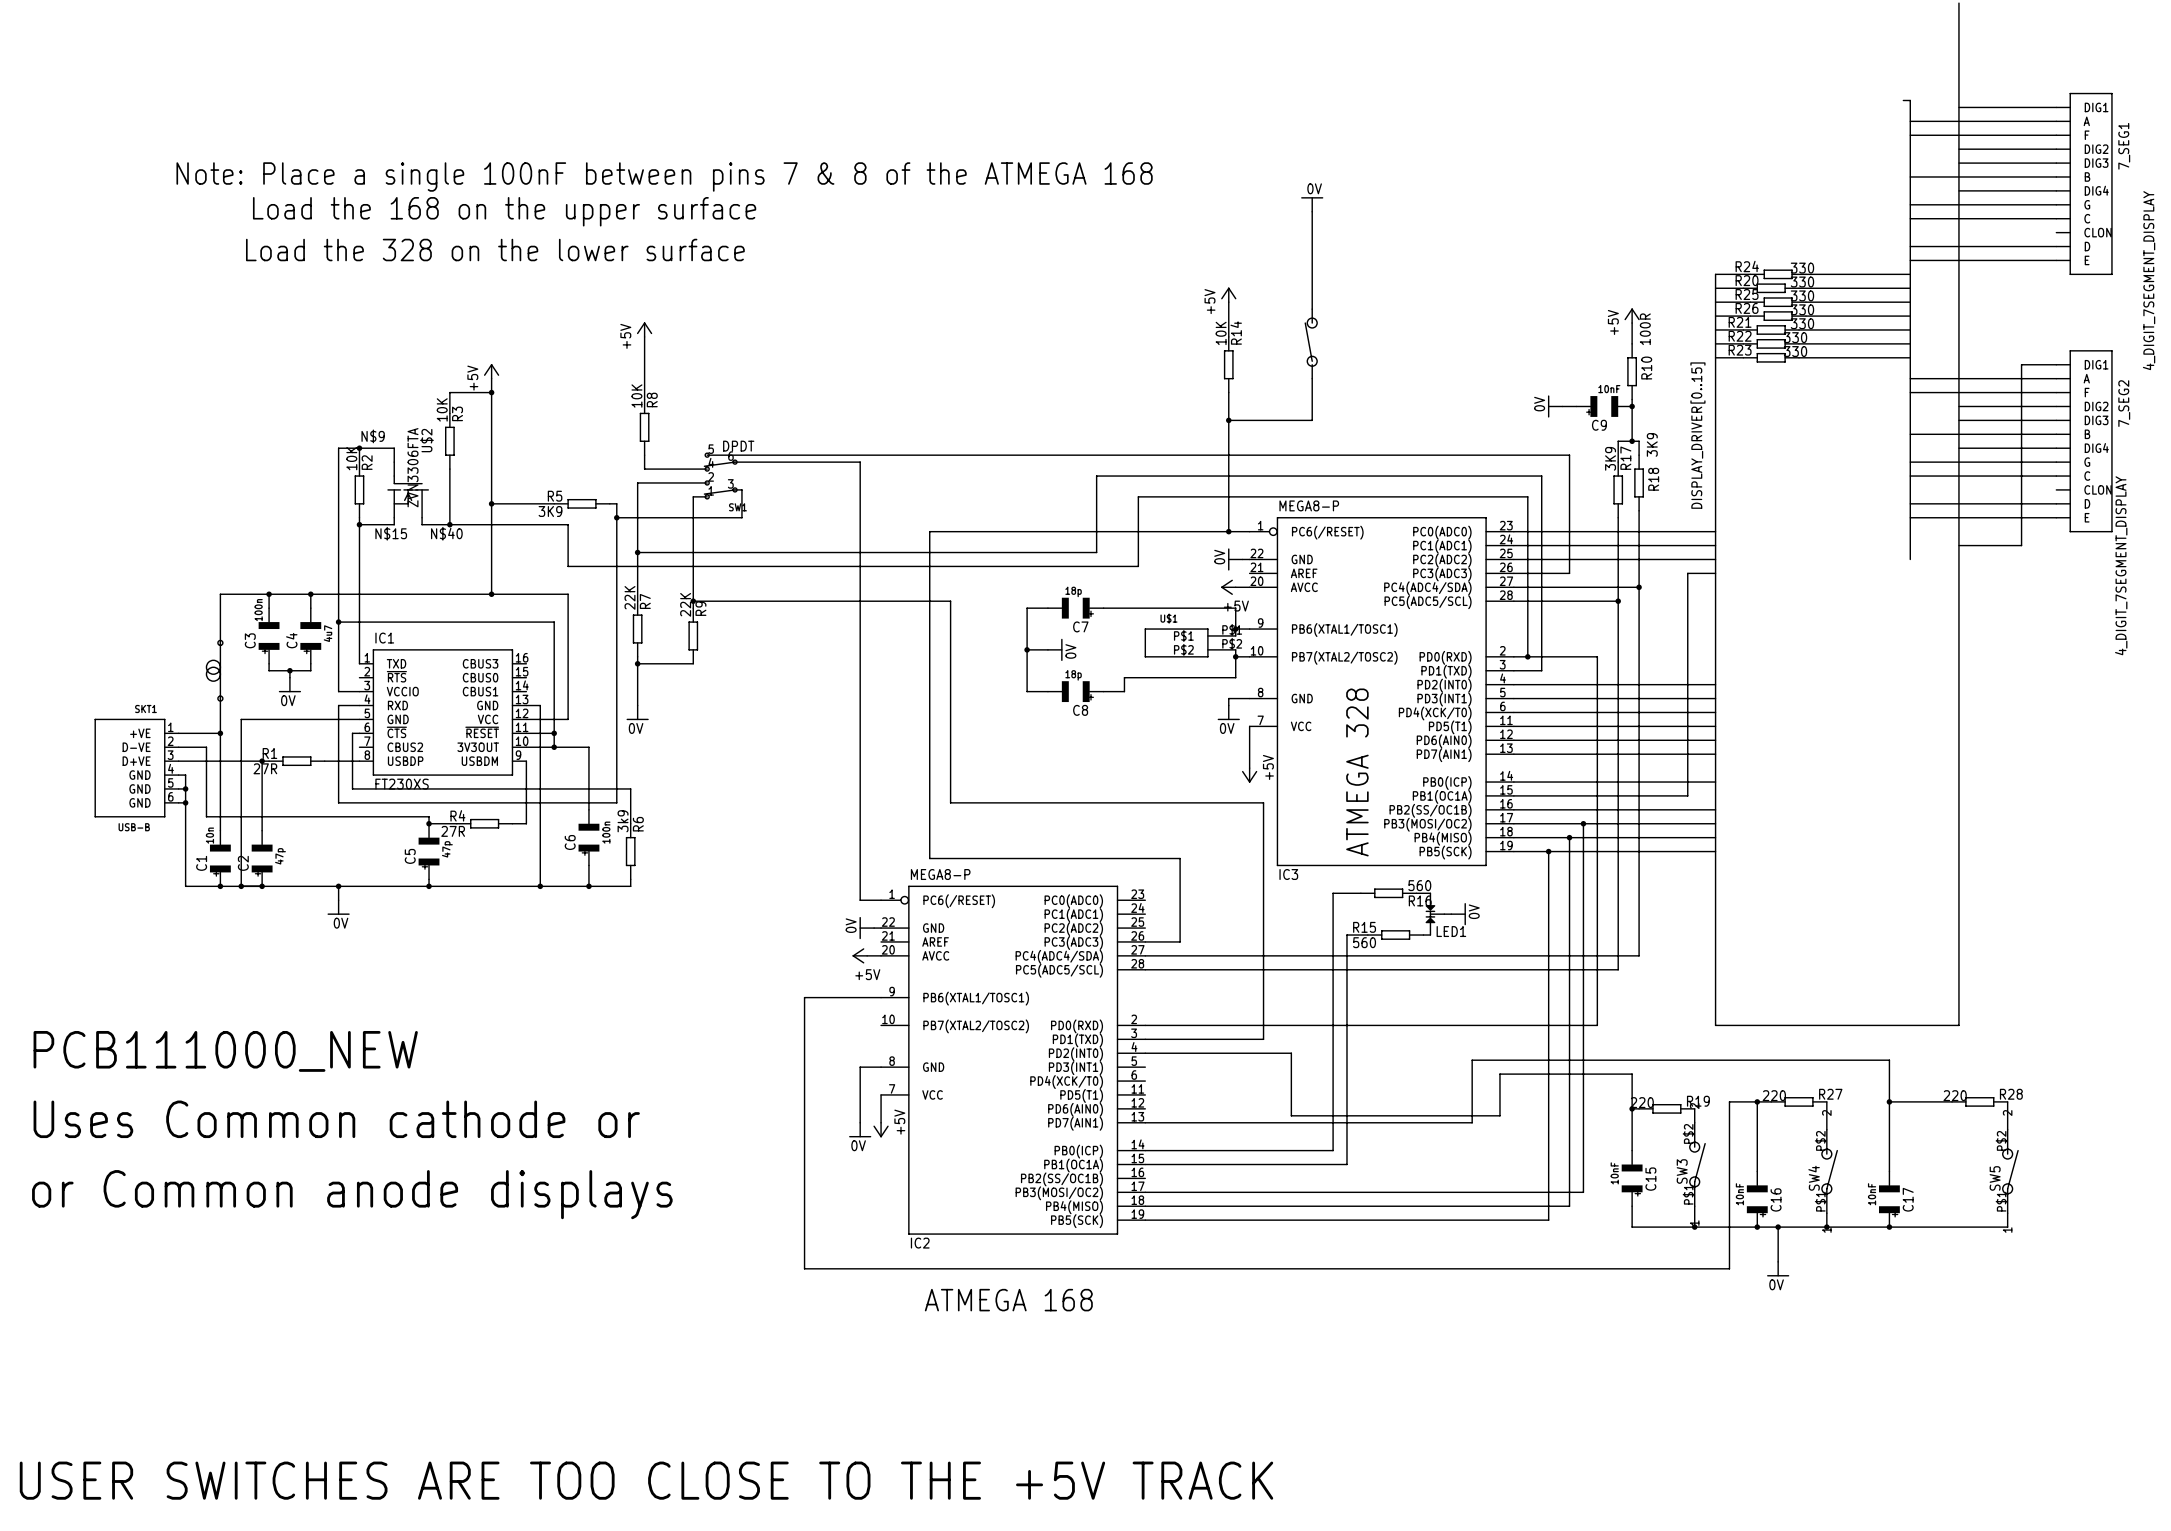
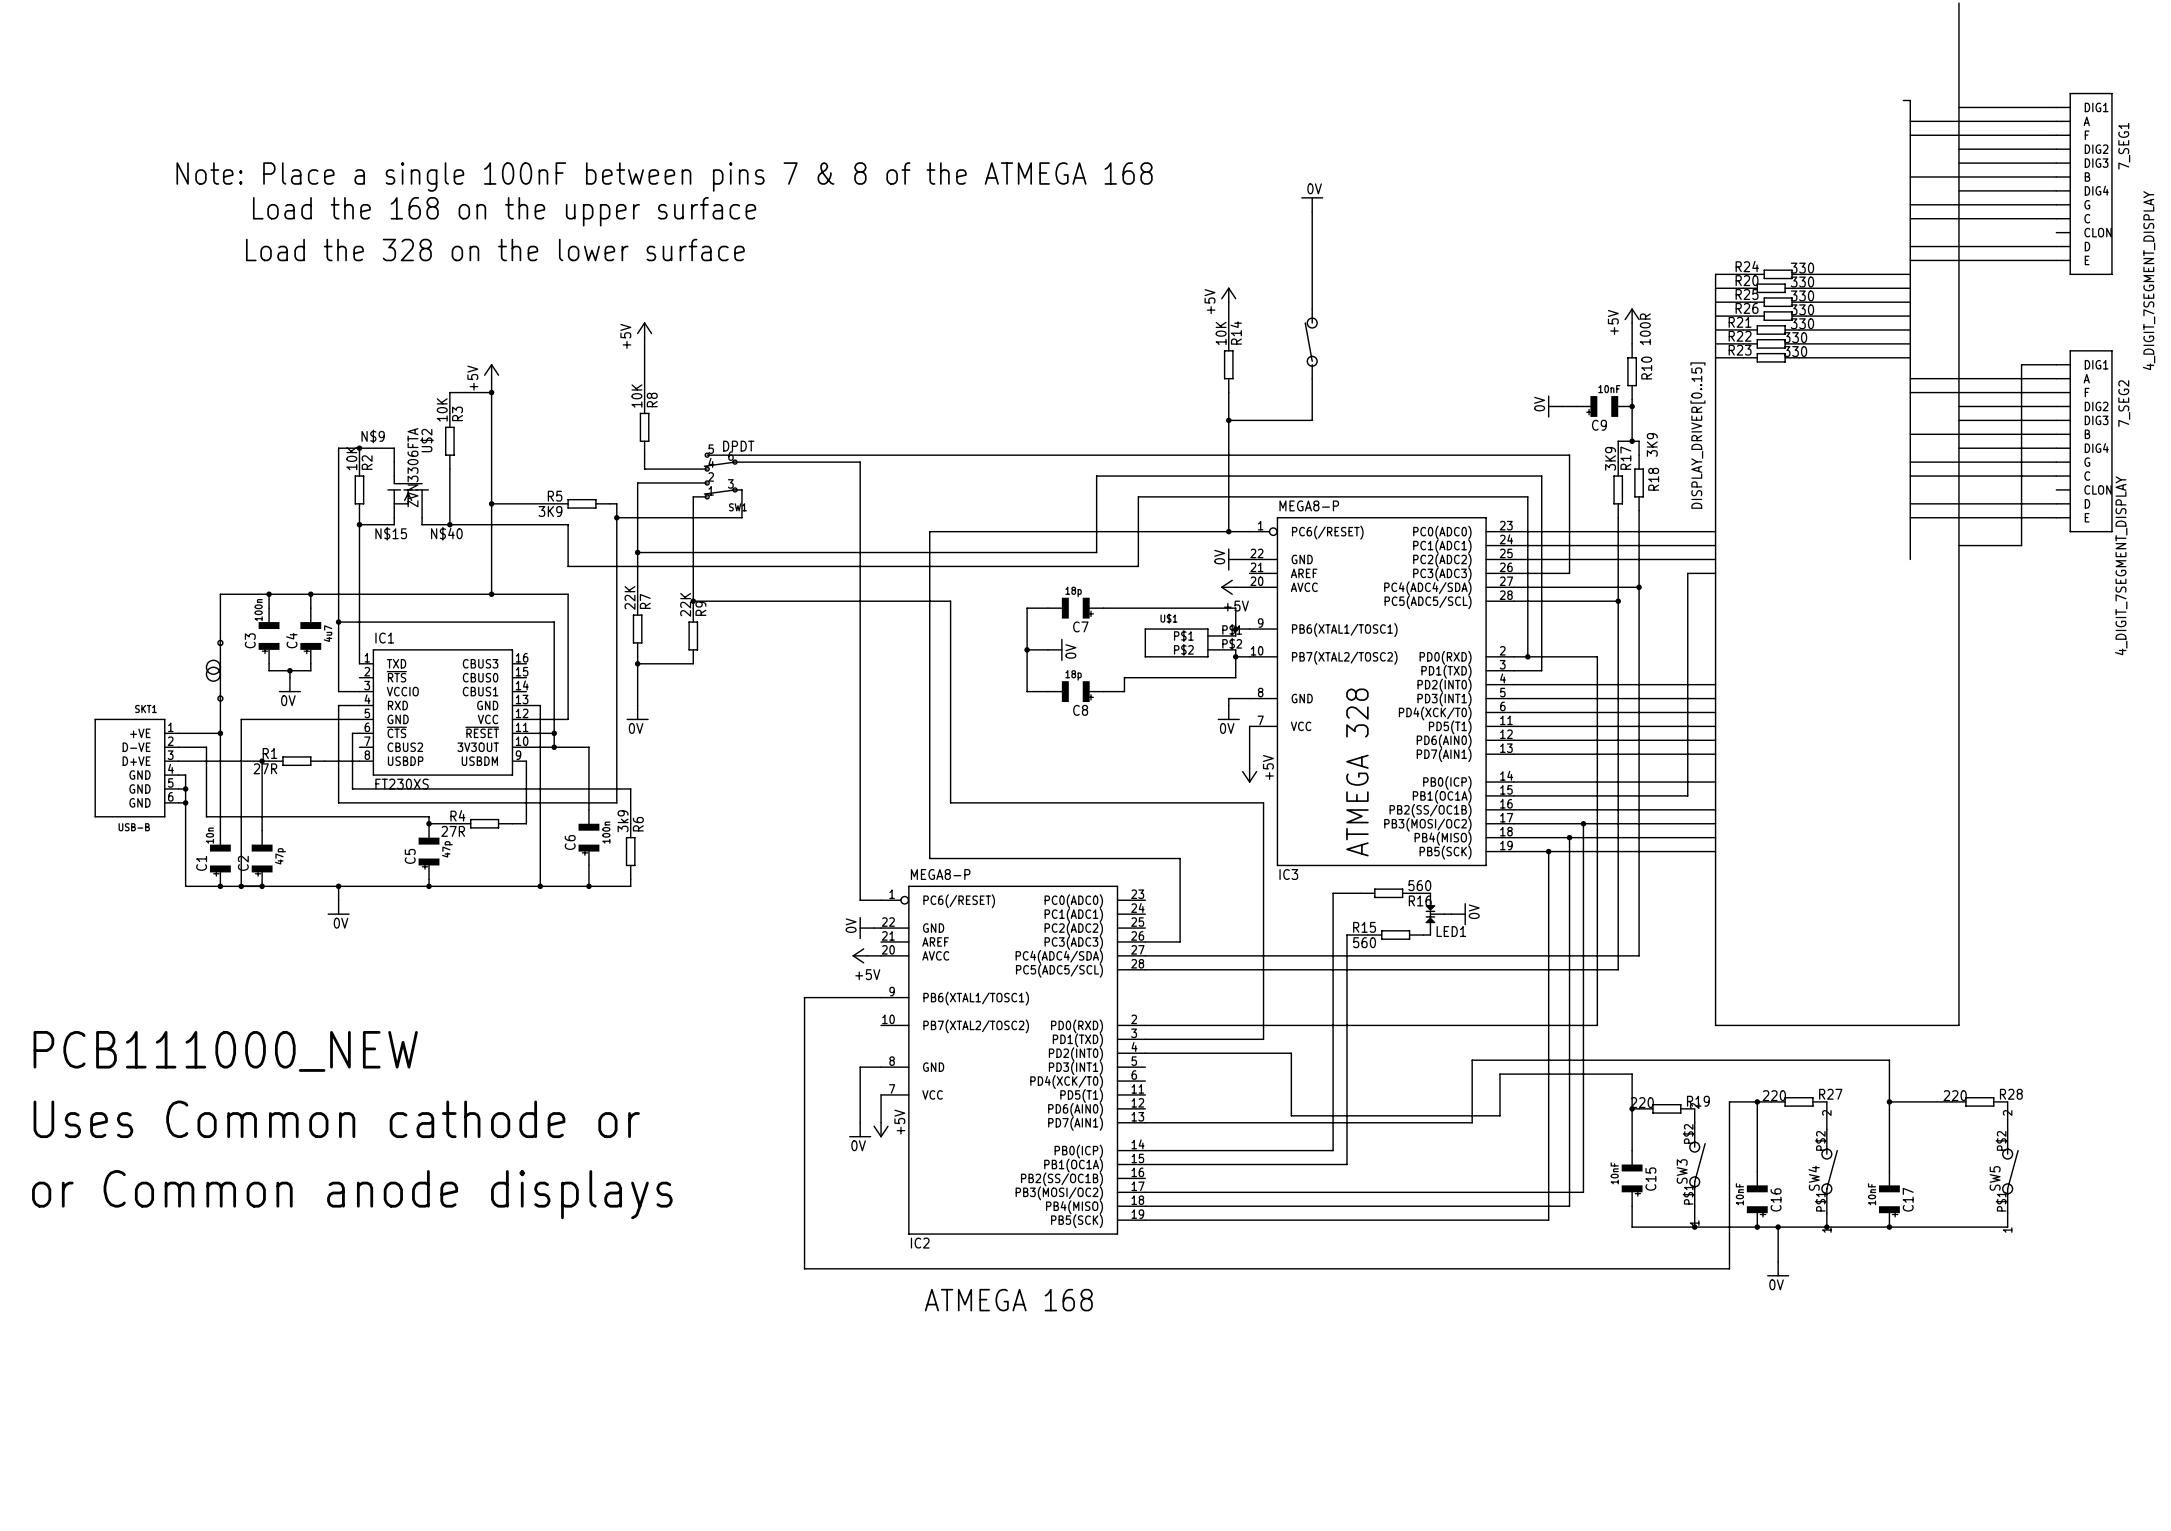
text: USER SWITCHES ARE TOO CLOSE TO THE +5V TRACK (646, 1480) -> none

